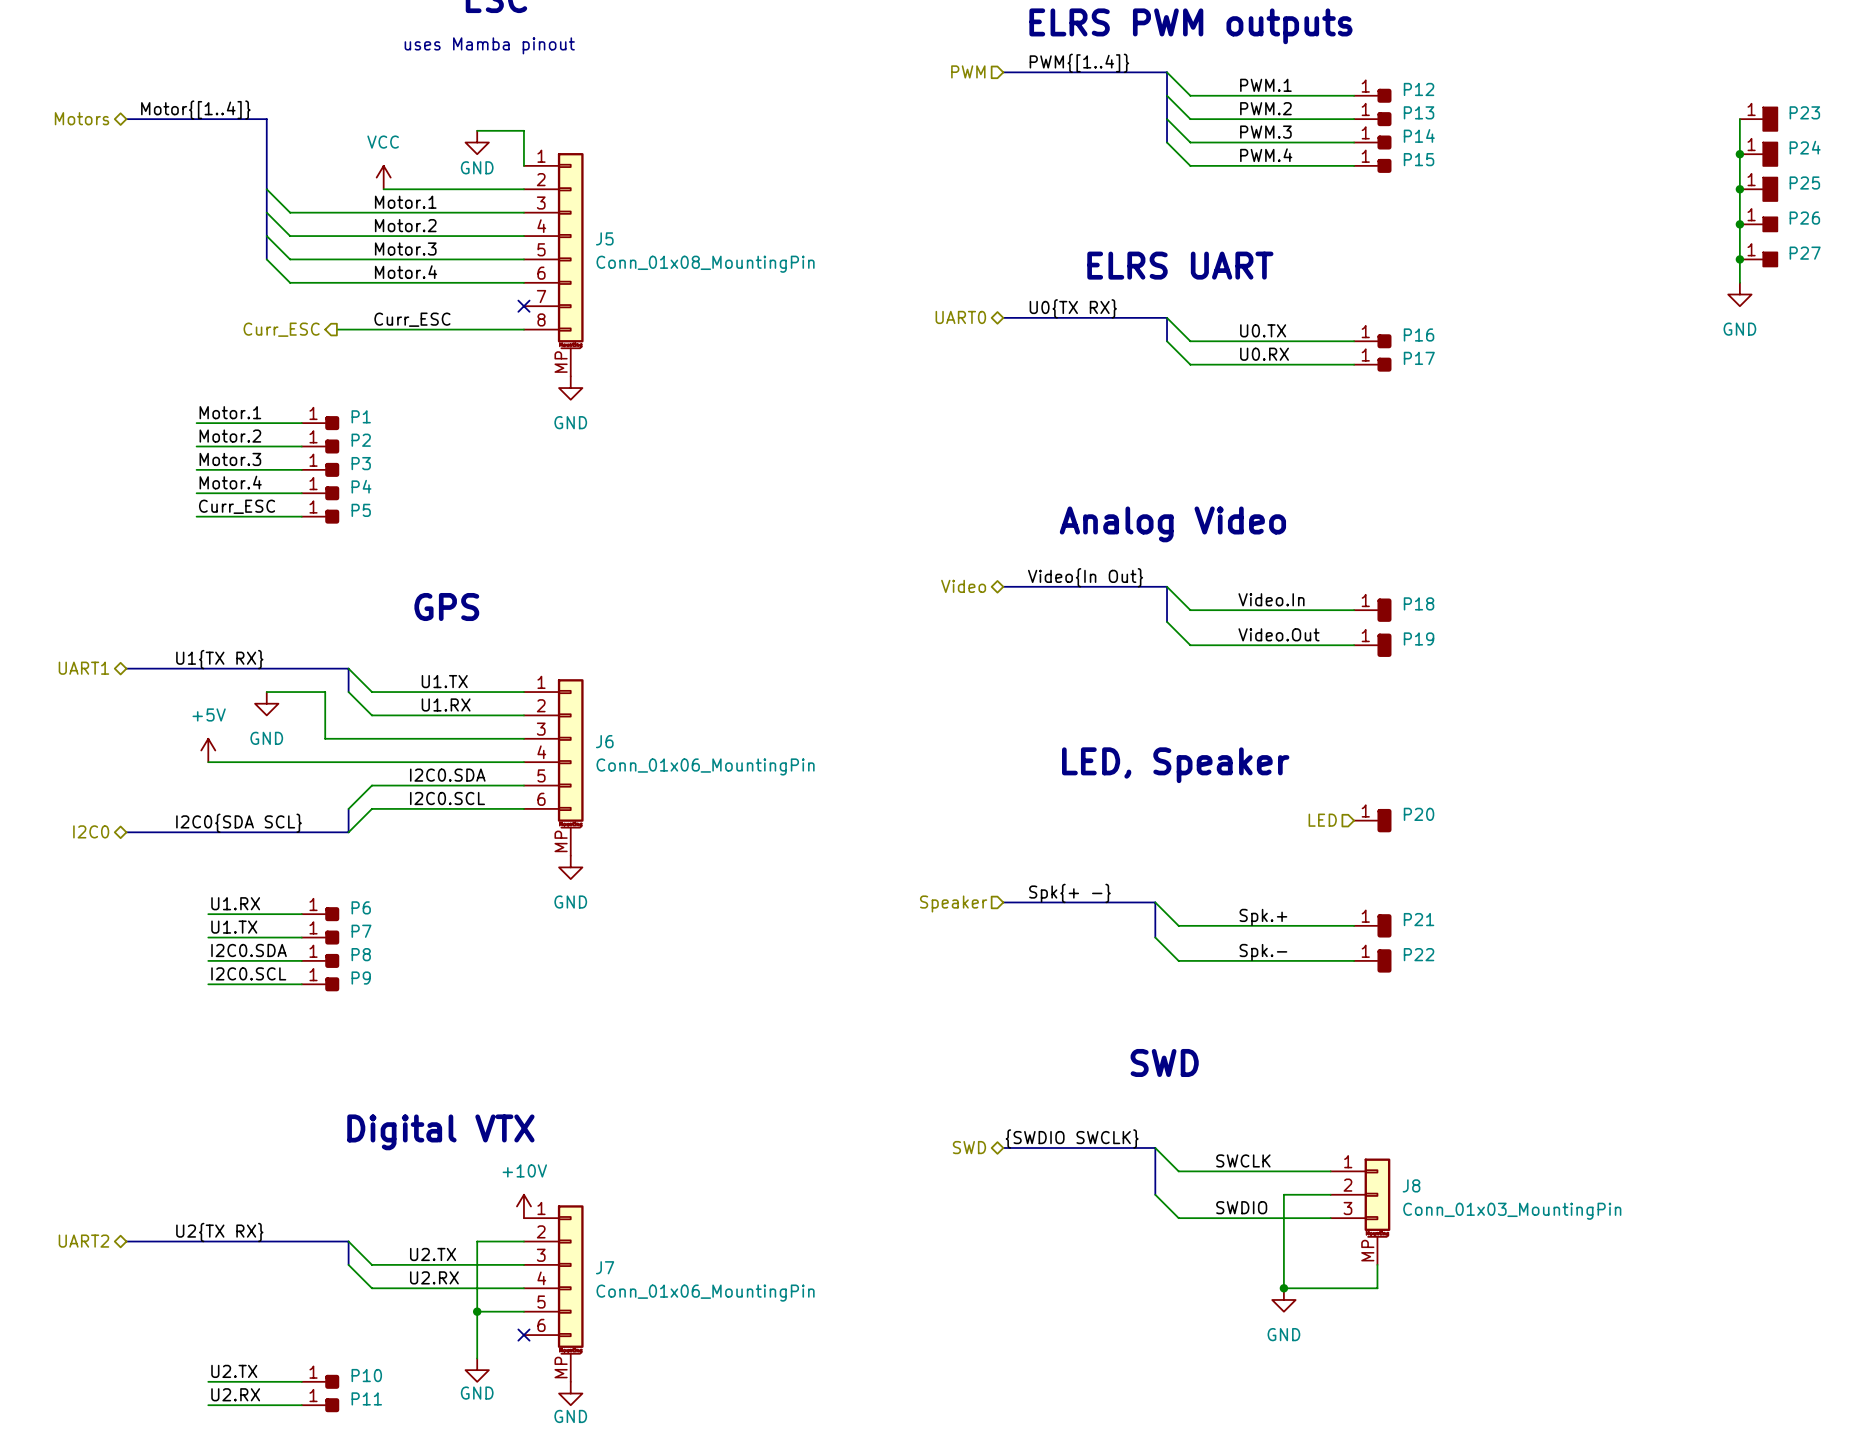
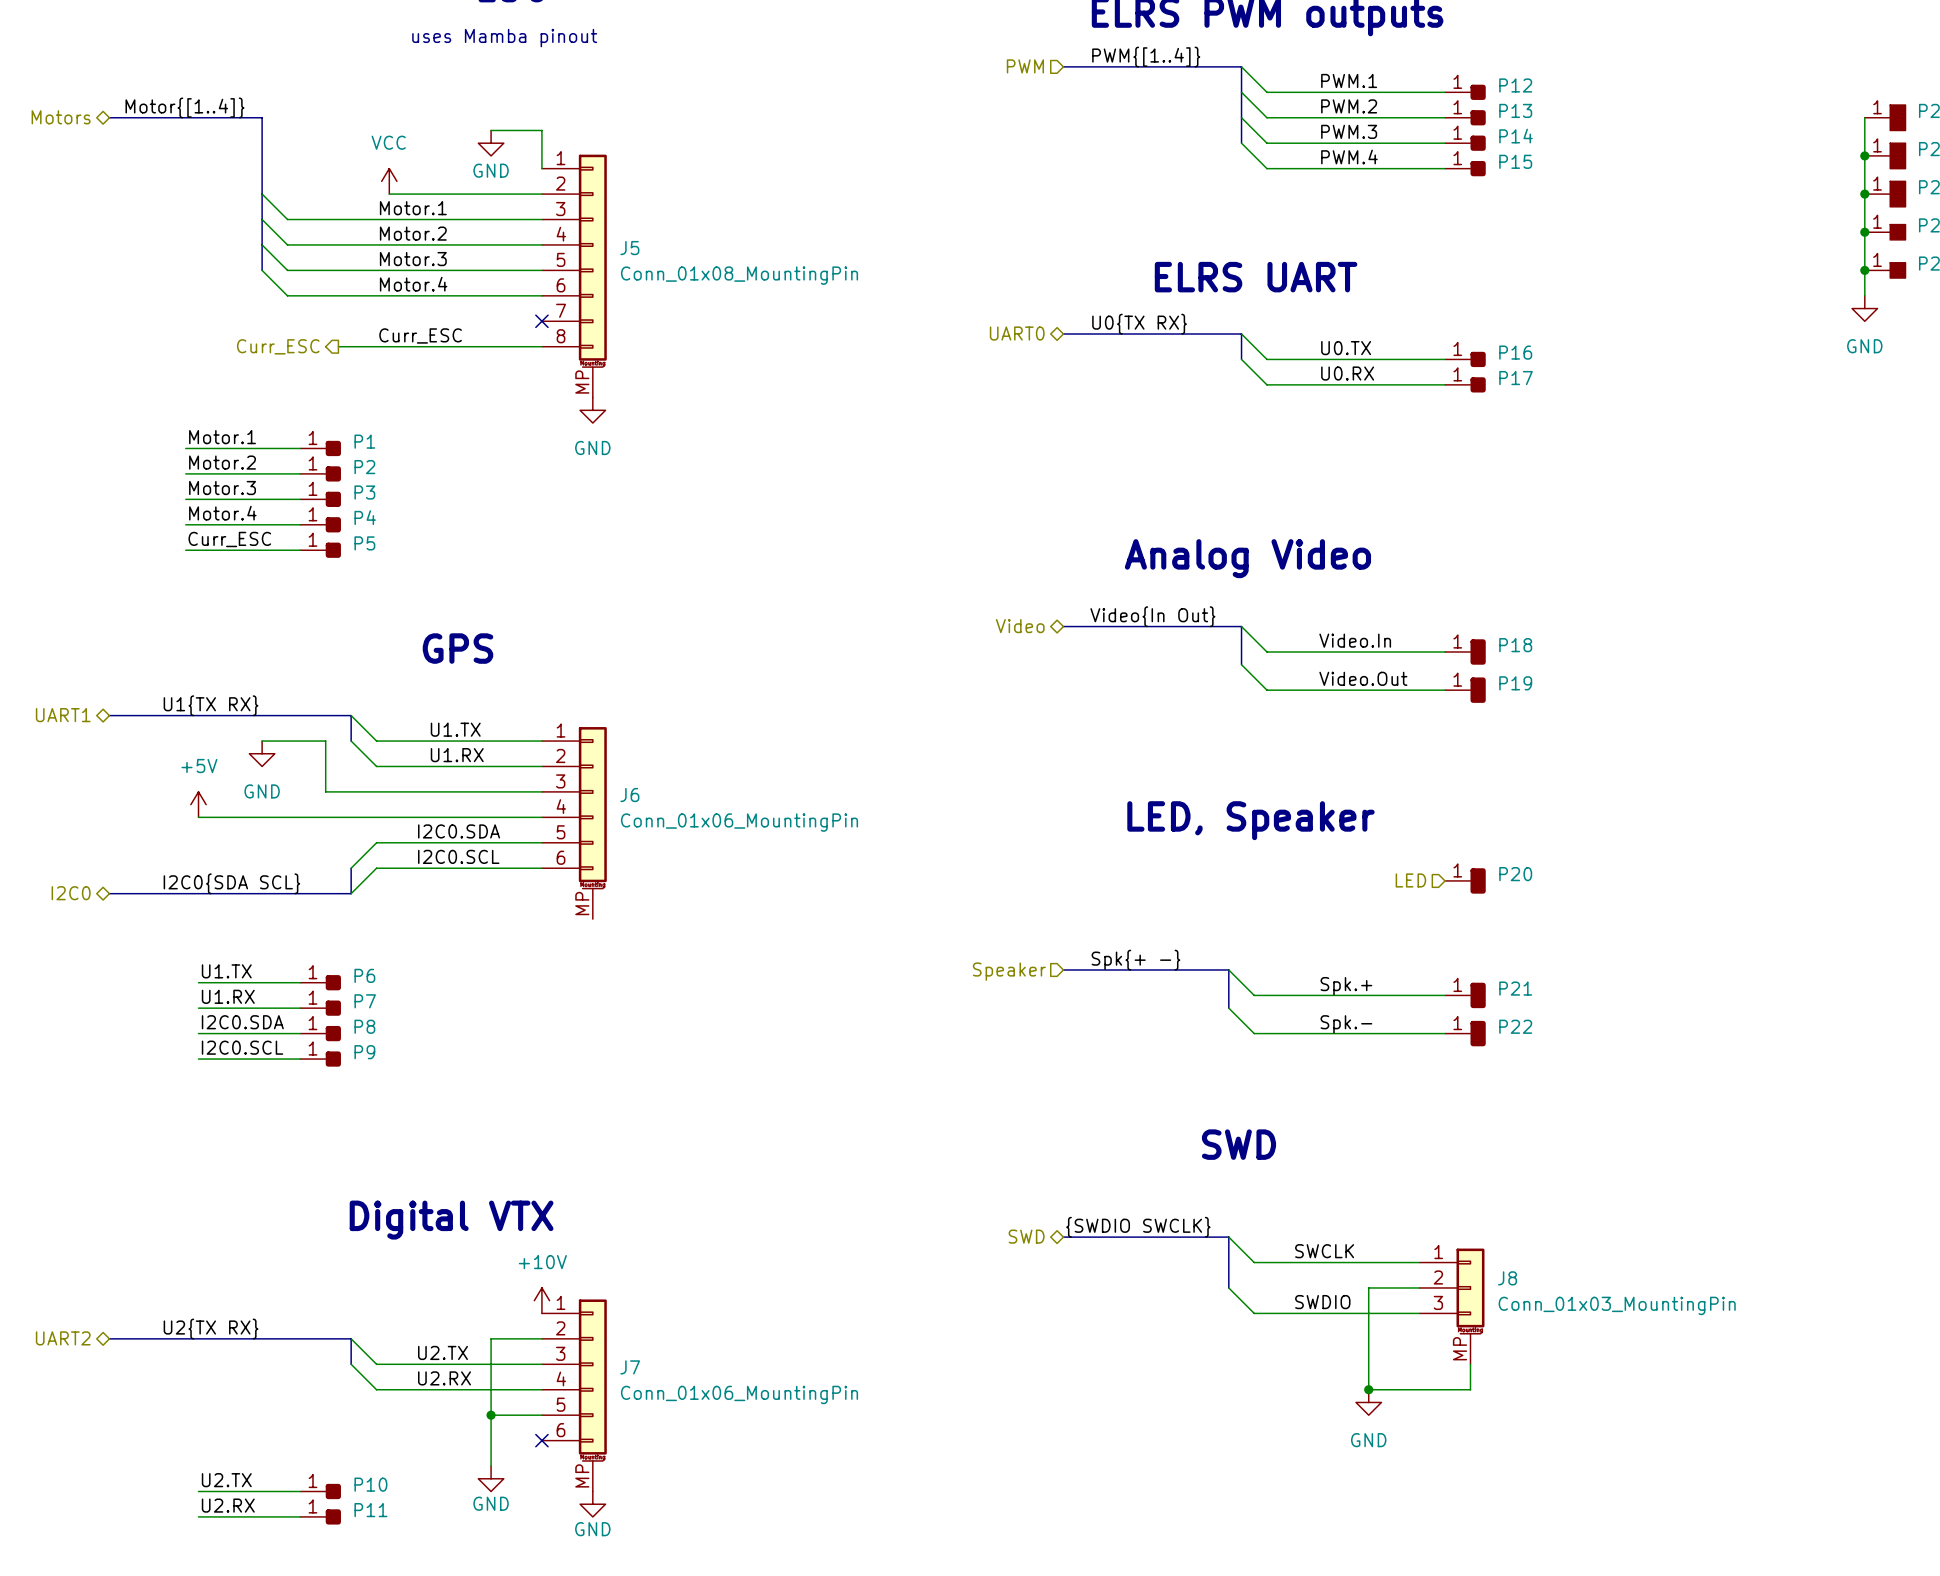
power symbol: GND (570, 867) -> none
label: U1.RX (235, 903) -> U1.TX (226, 971)
label: U1.TX (234, 927) -> U1.RX (228, 996)

